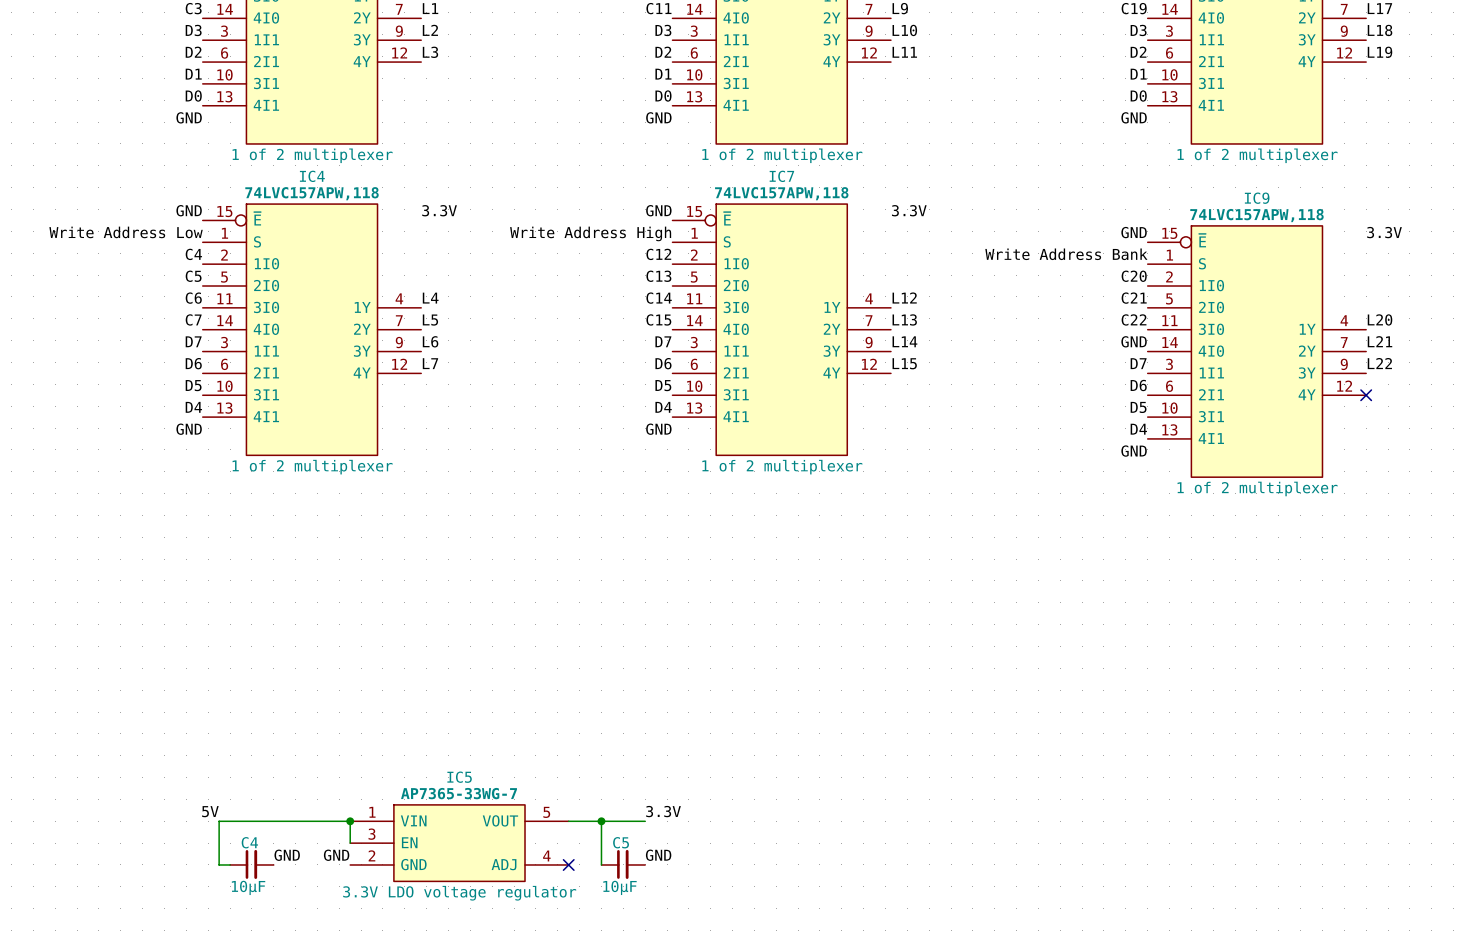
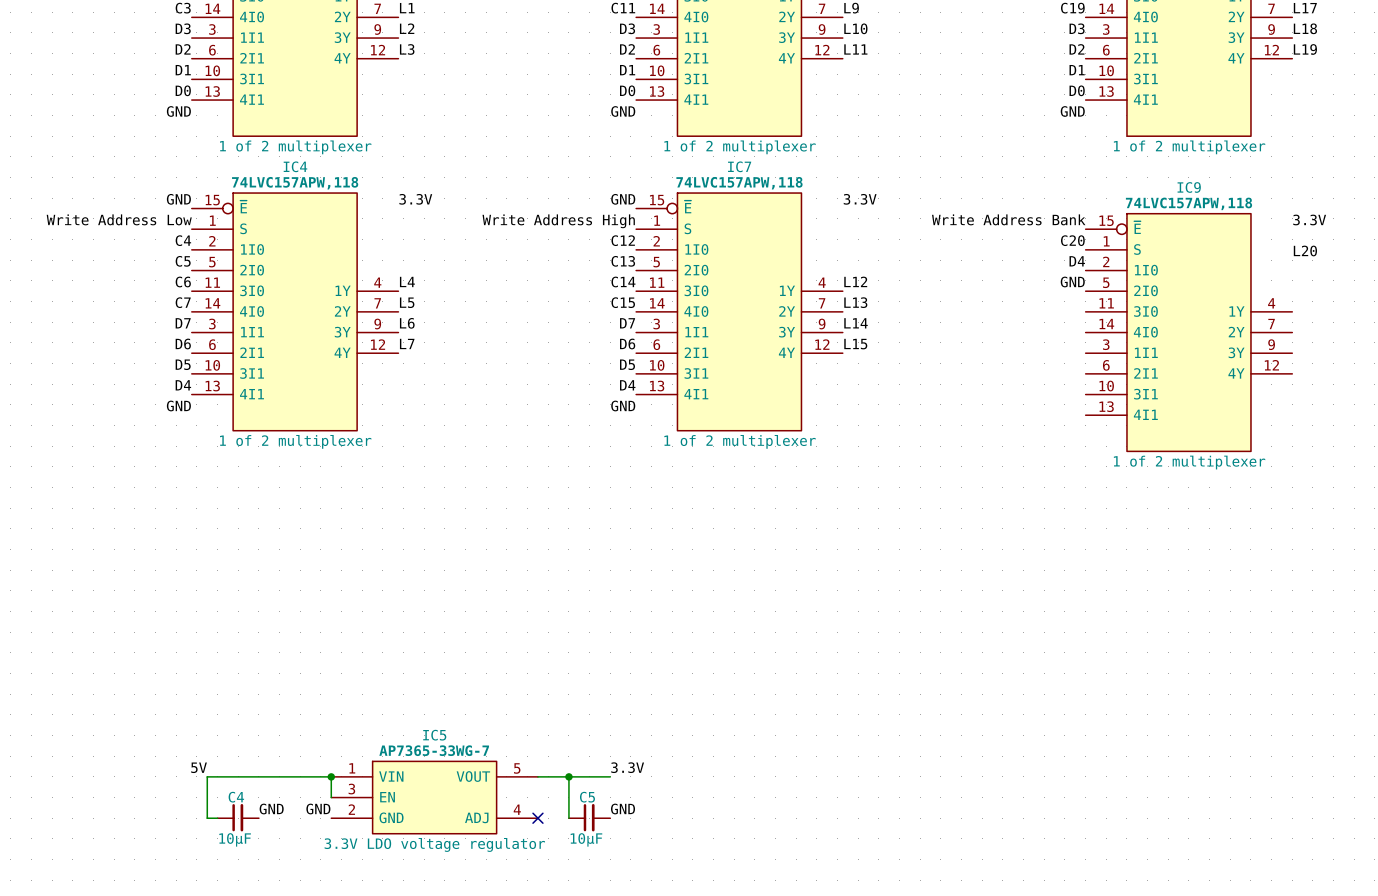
label: GND (1134, 232) -> Write Address Bank (1008, 219)
label: Write Address Bank (1066, 254) -> C20 (1072, 240)
label: C20 (1134, 276) -> D4 (1077, 261)
label: C21 (1134, 298) -> GND (1072, 281)
label: C22 (1134, 319) -> none
label position: L20 (1380, 319) -> L20 (1305, 250)
label: GND (1134, 341) -> none
label: L21 (1379, 341) -> none
label: D7 (1138, 363) -> none
label: L22 (1379, 363) -> none
label: D6 (1138, 385) -> none
no-connect mark: (1366, 395) -> none
label: D5 (1138, 407) -> none
label: D4 (1138, 429) -> none
label: GND (1134, 451) -> none

